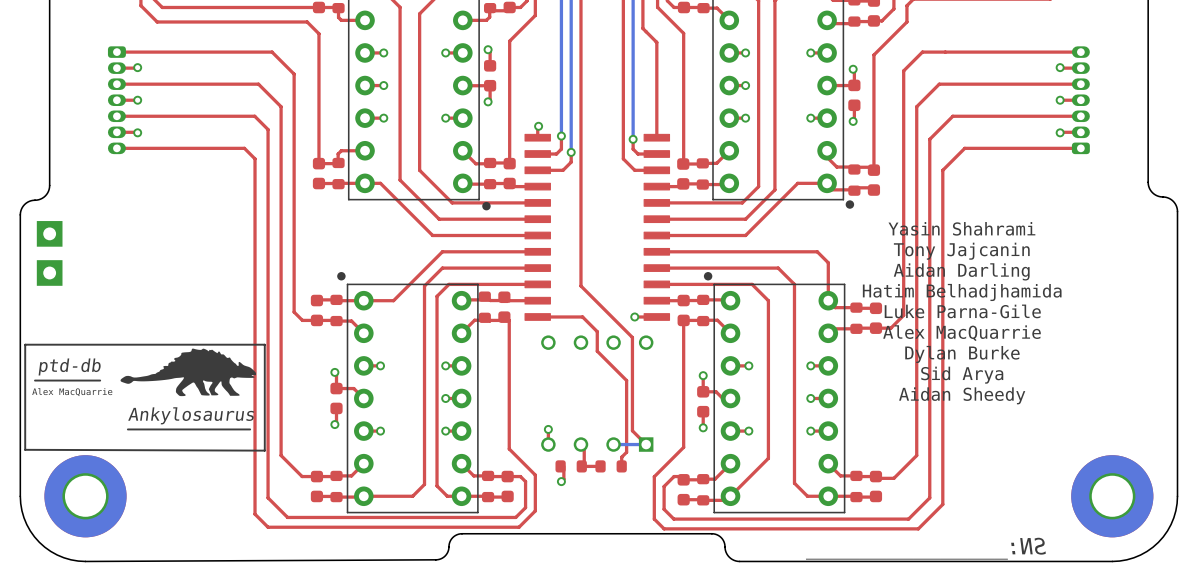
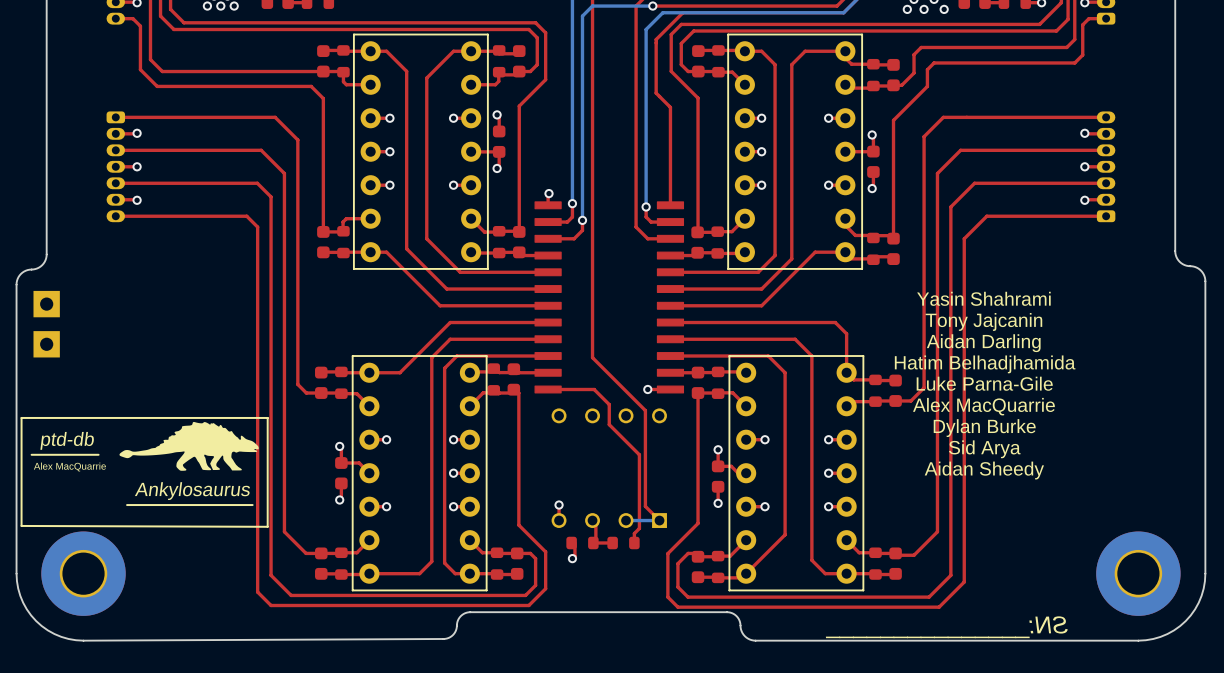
drawing: [845, 200, 855, 209] -> none
drawing: [482, 201, 491, 211] -> none
drawing: [337, 272, 346, 281] -> none
drawing: [703, 272, 713, 281] -> none

